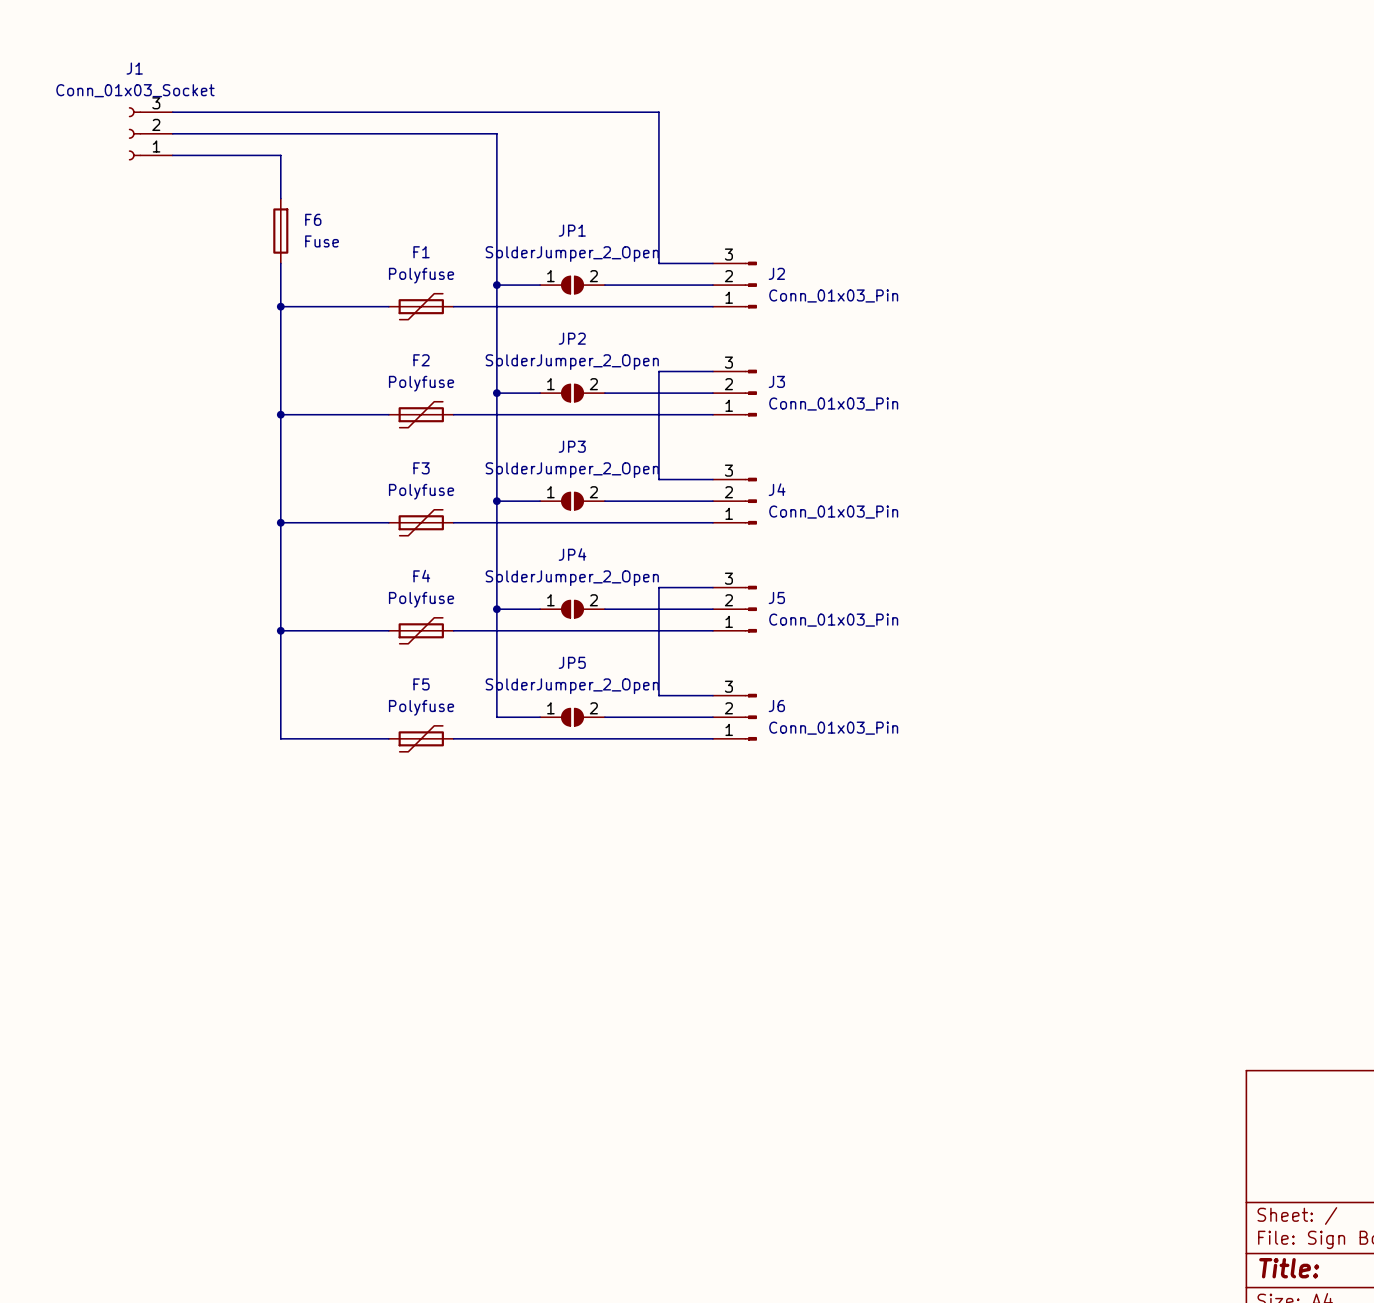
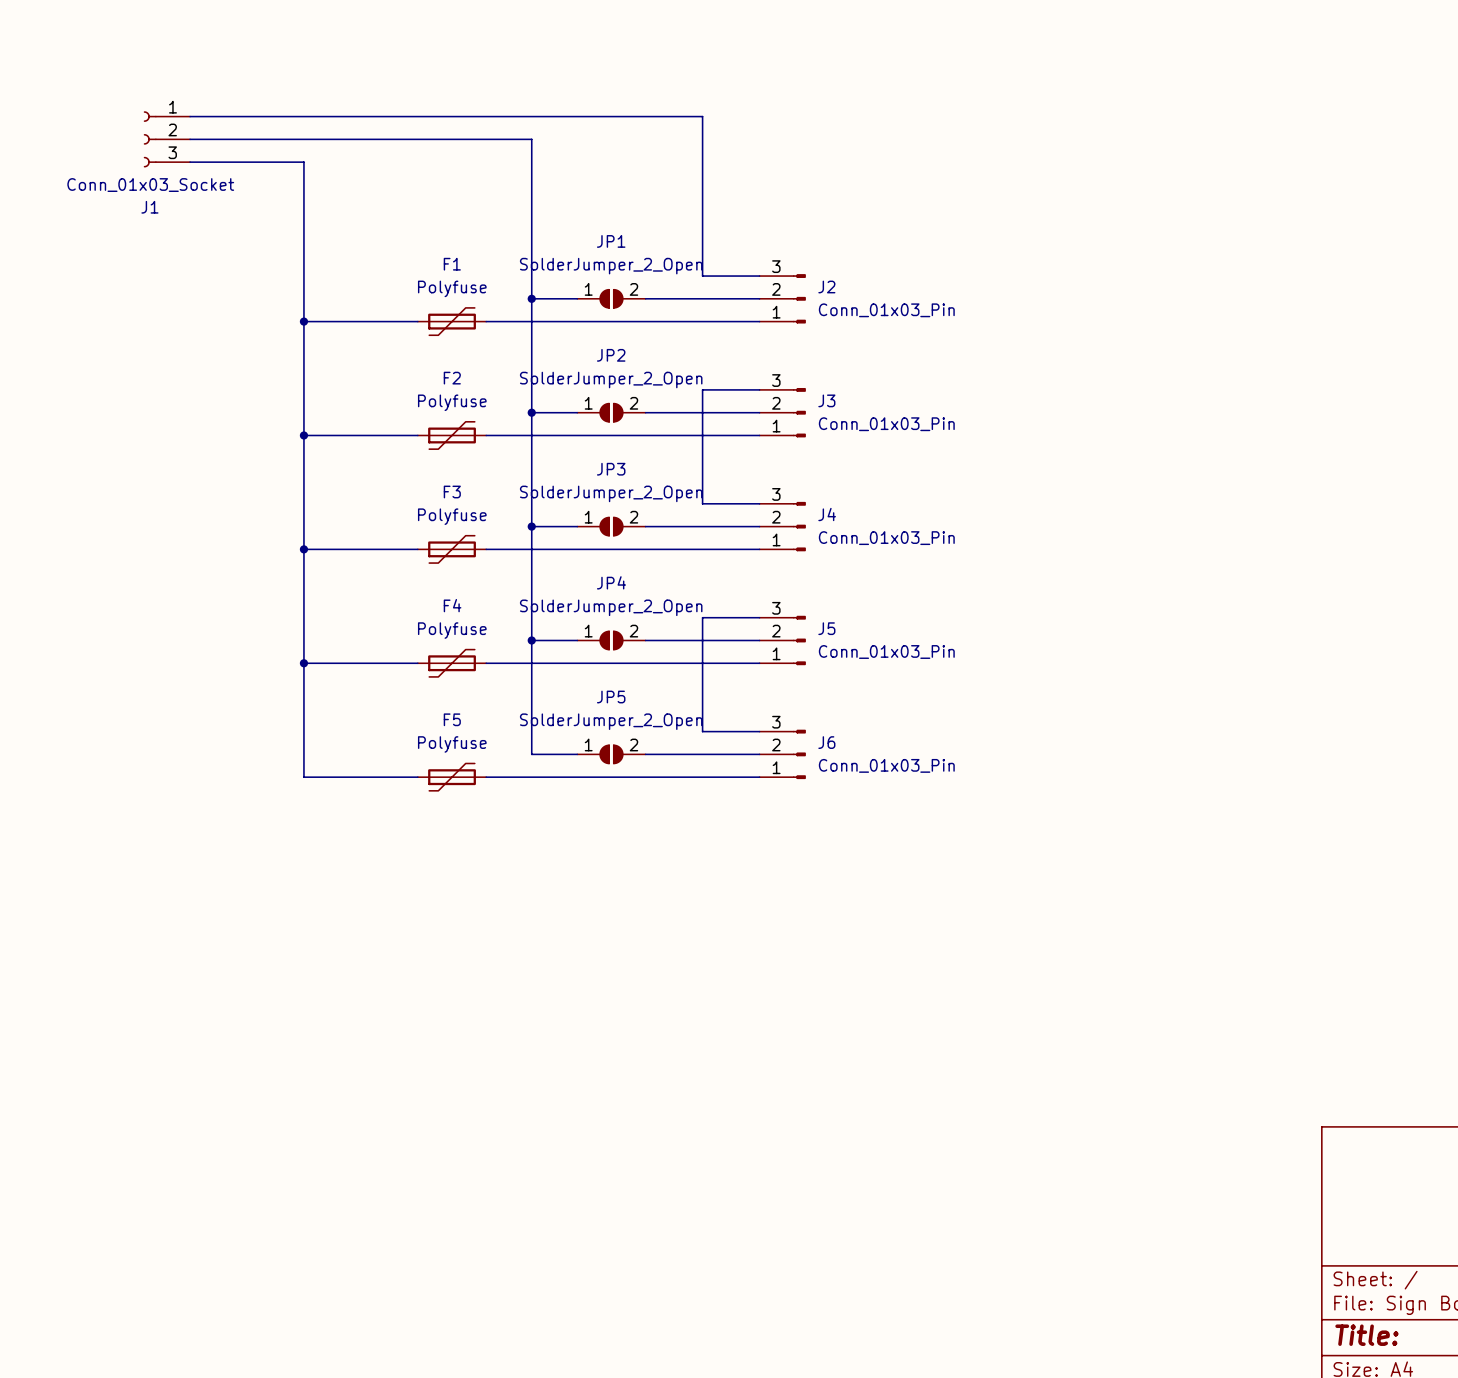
J1 flip: as is (134, 133) -> up-down (150, 139)
F6: Fuse (280, 231) -> none

